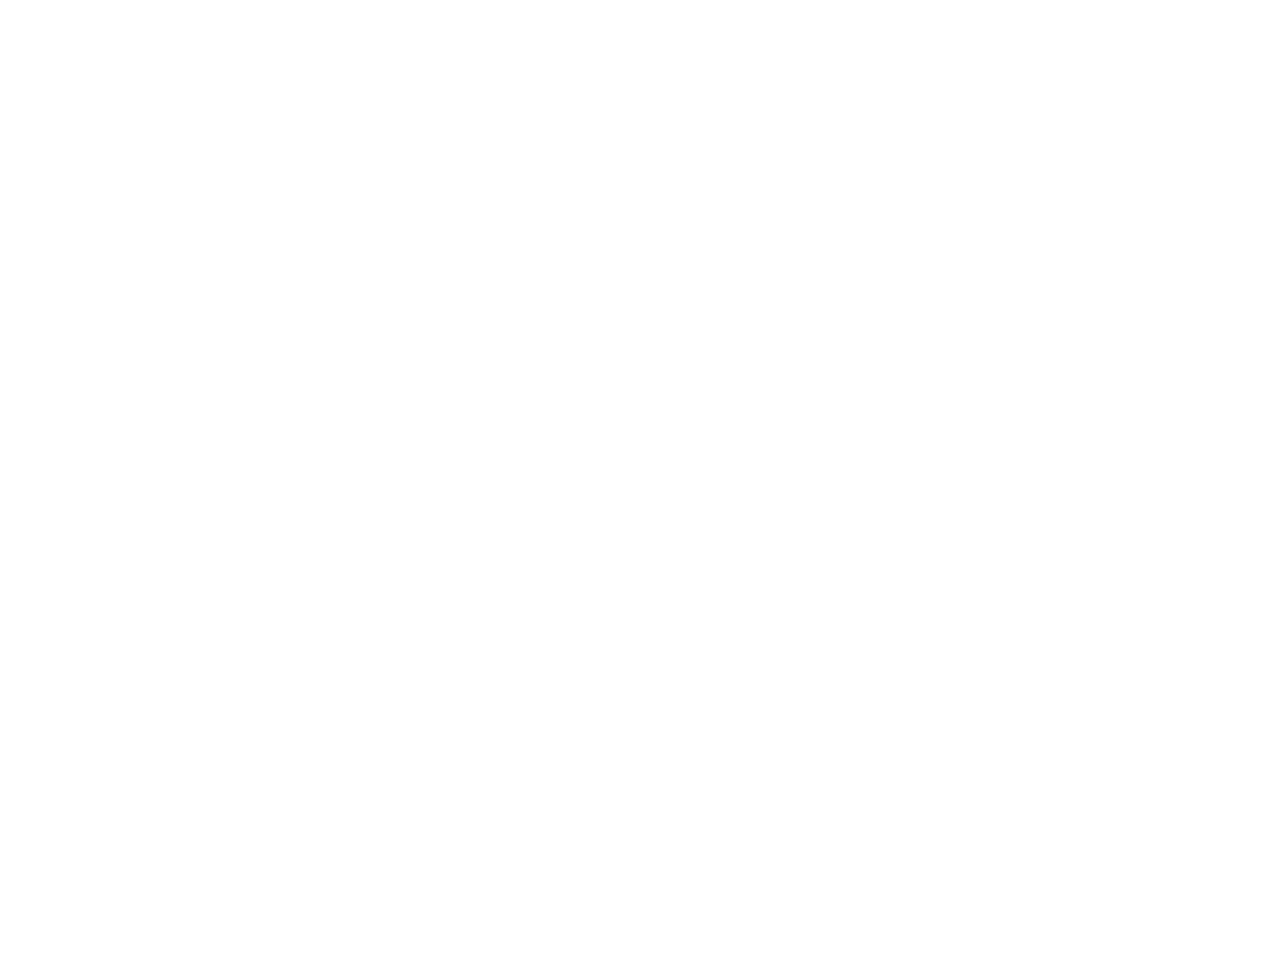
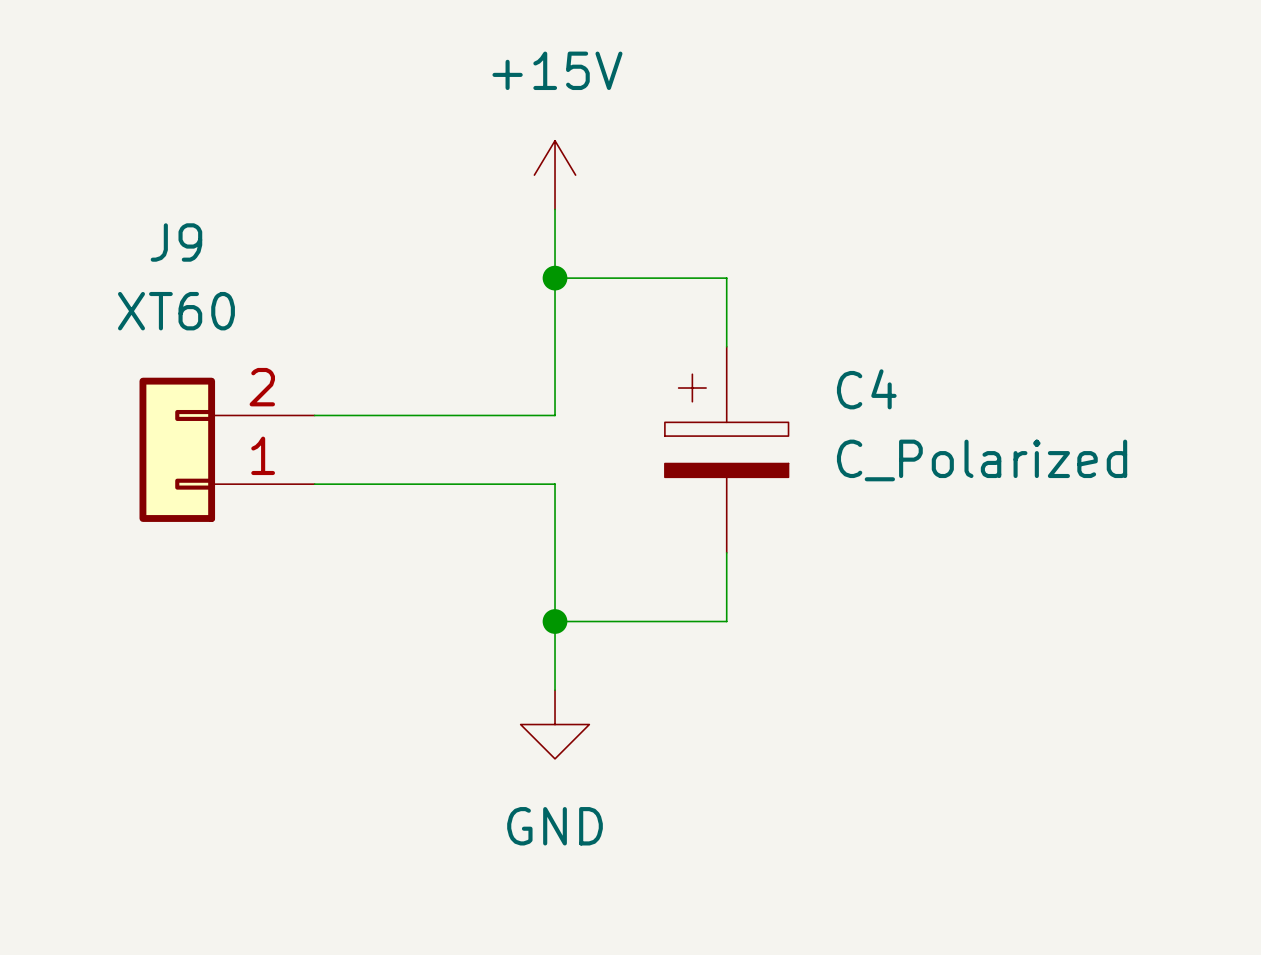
power symbol: none -> +15V (555, 175)
wire: none -> (555, 209) (555, 415) (314, 415)
wire: none -> (555, 278) (726, 278) (726, 346)
junction: none -> (555, 278)
J9: none -> XT60 (227, 449)
C4: none -> C_Polarized (726, 449)
wire: none -> (314, 484) (555, 484) (555, 690)
wire: none -> (726, 552) (726, 621) (555, 621)
junction: none -> (555, 621)
power symbol: none -> GND (555, 724)

